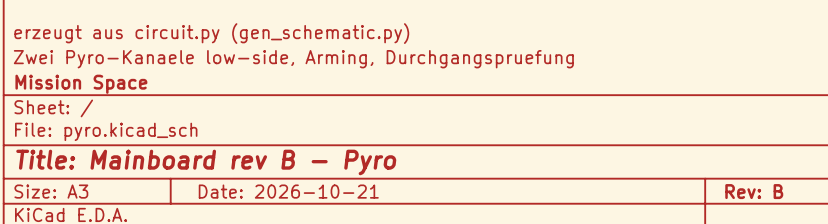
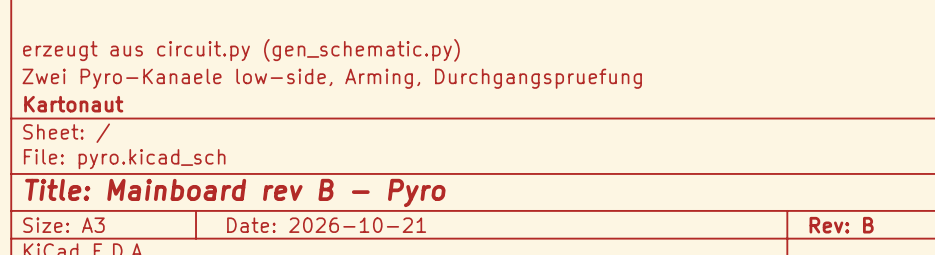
title block: Mission Space (81, 84) -> Kartonaut (73, 104)

